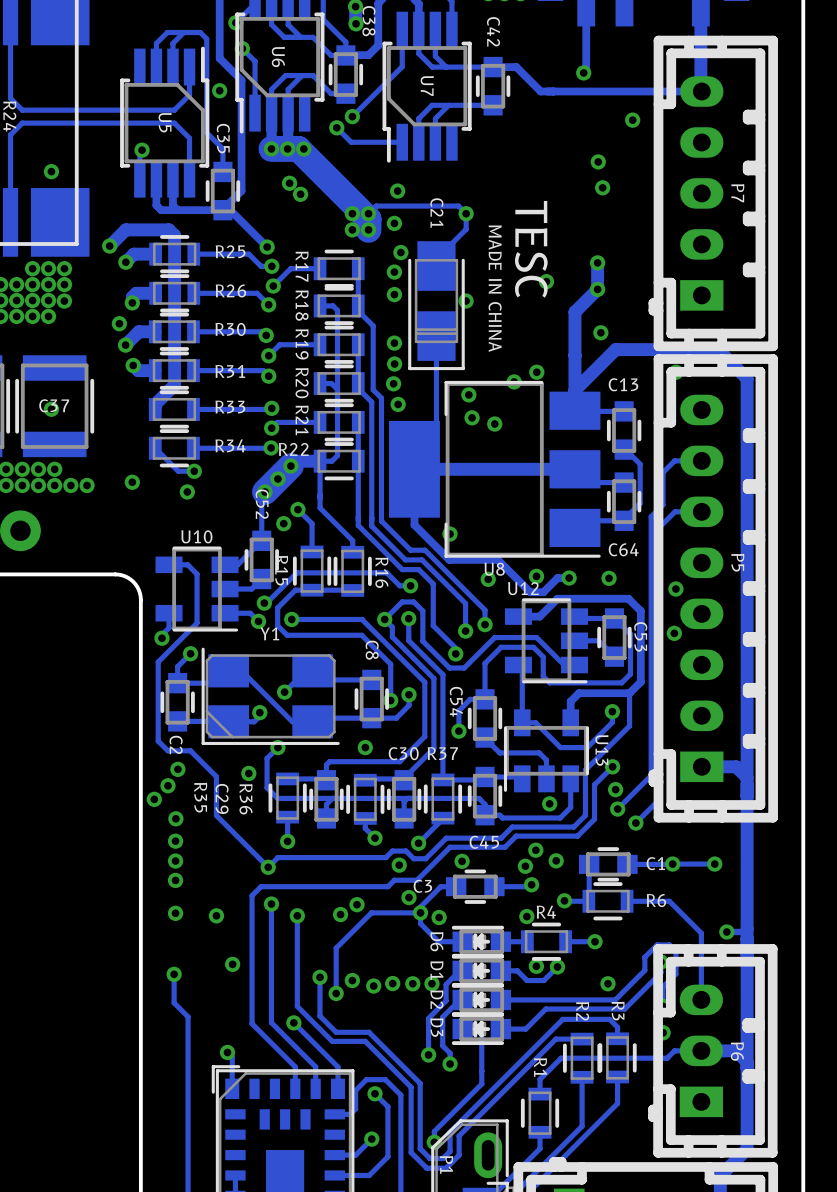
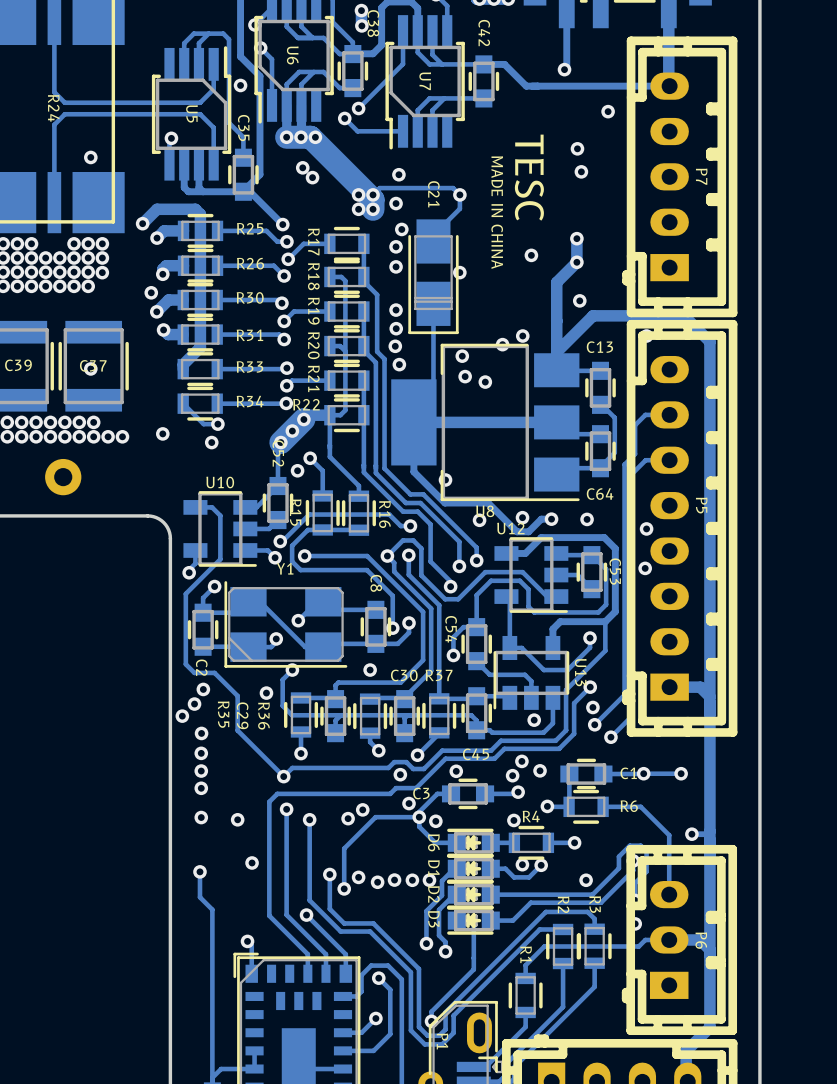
text position: TESC (531, 249) -> TESC (529, 177)
text position: MADE IN CHINA (495, 288) -> MADE IN CHINA (497, 212)

